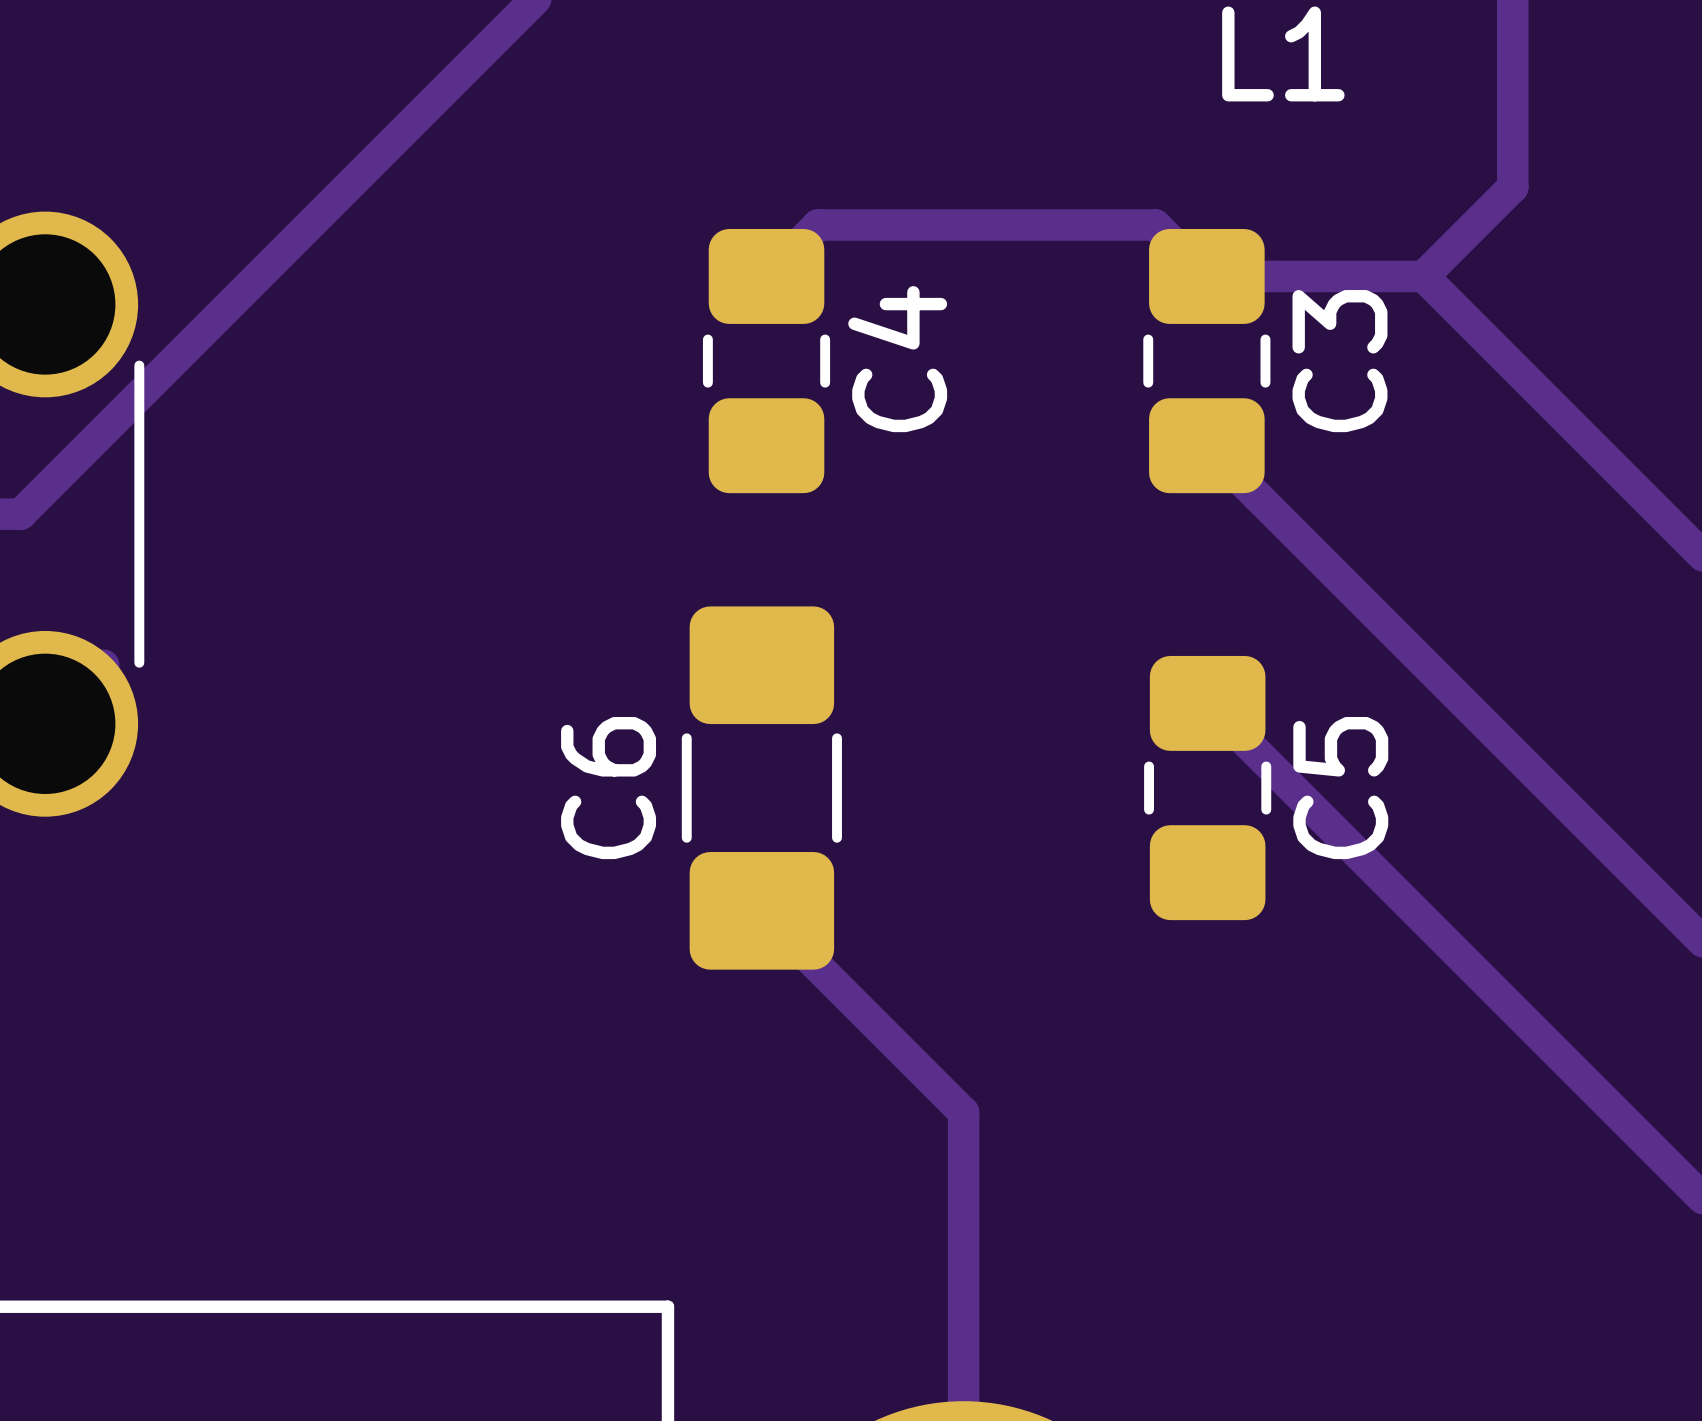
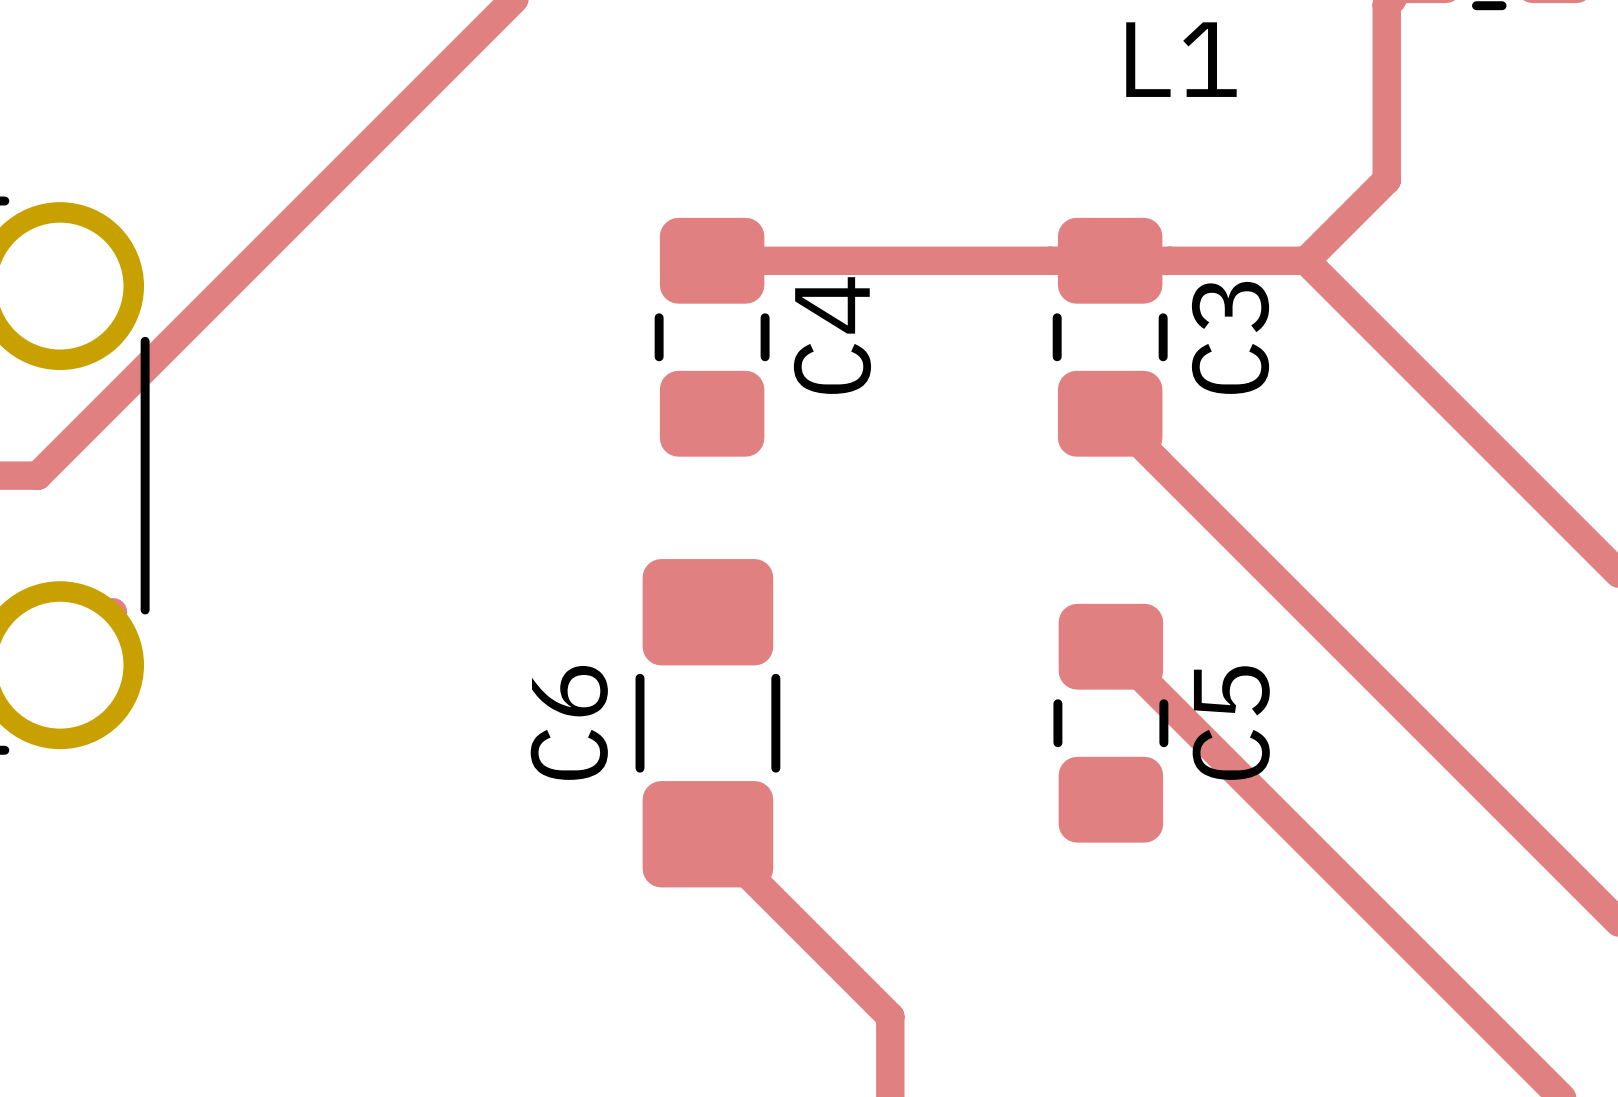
track: (766, 276) (817, 225) (1155, 225) (1206, 276) -> (712, 260) (1110, 260)

